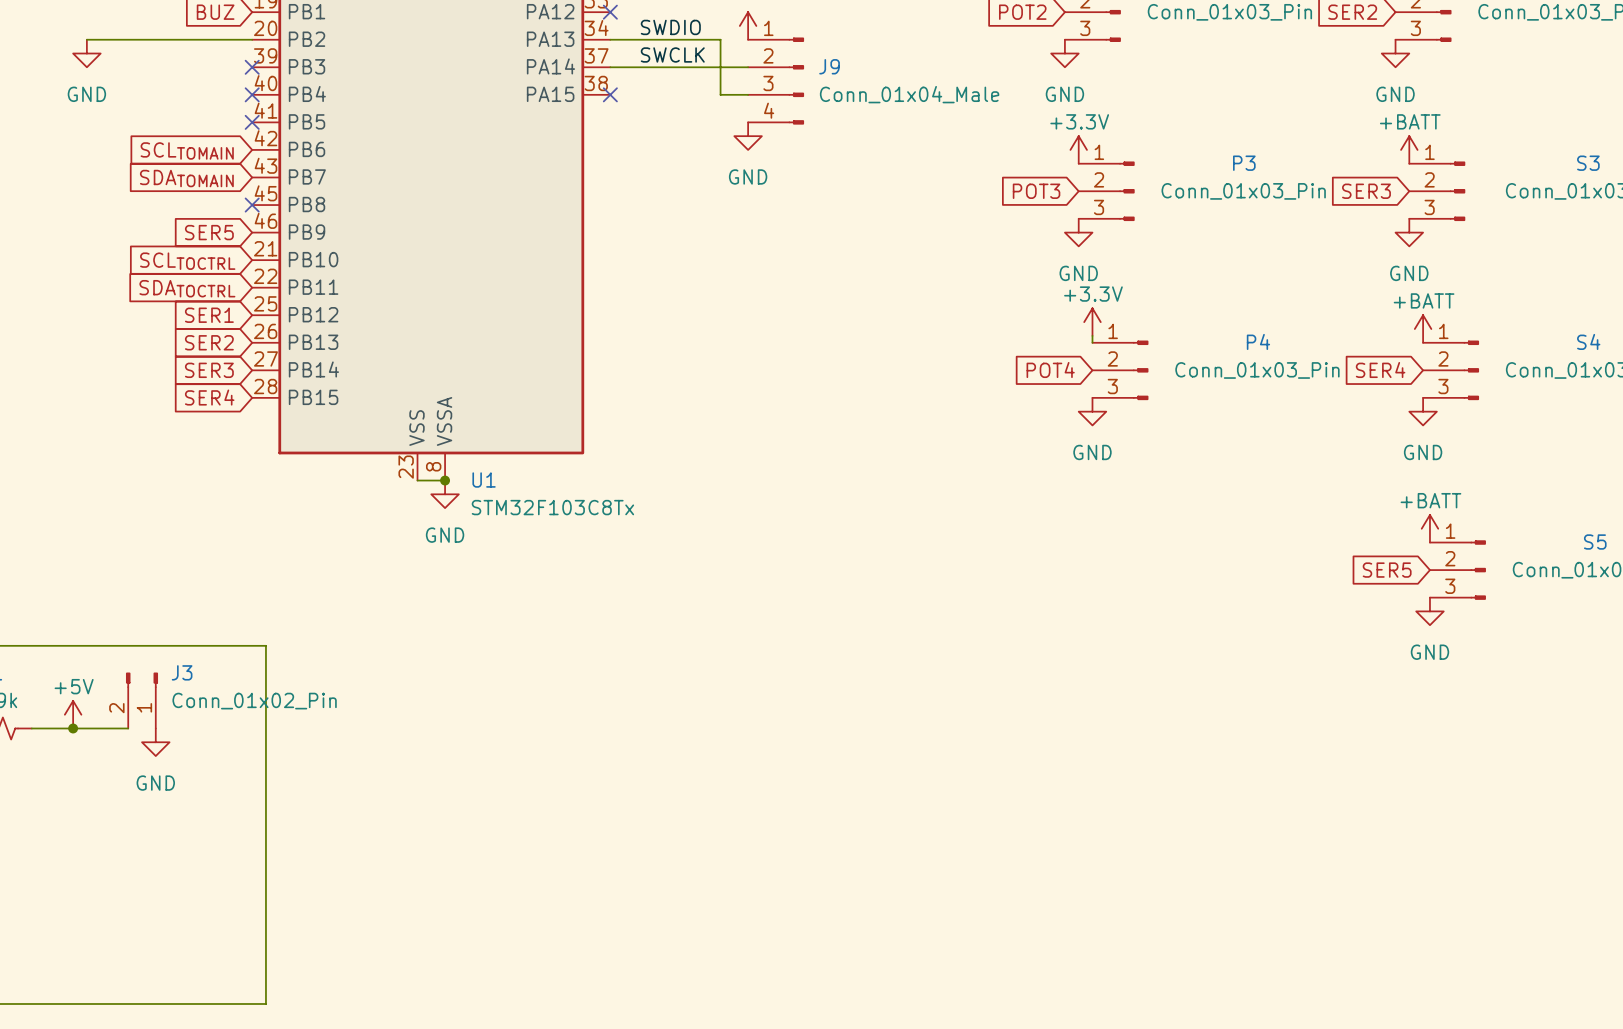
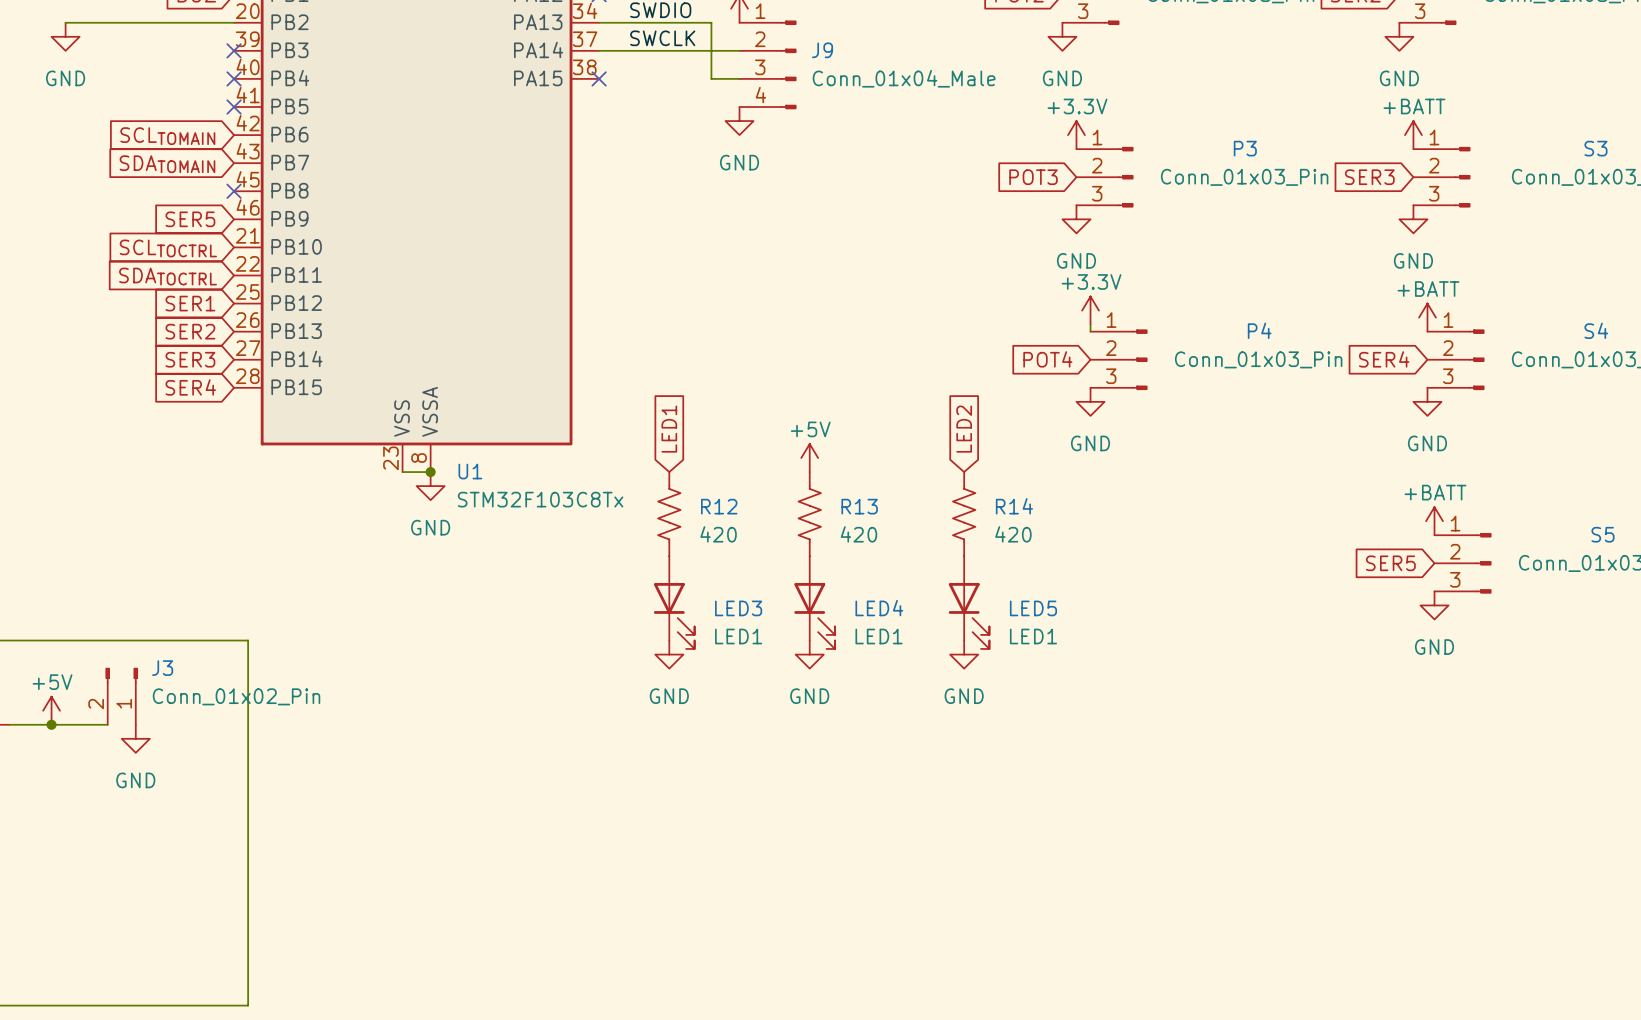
global label: none -> LED1 (669, 429)
global label: none -> LED2 (964, 429)
power symbol: none -> +5V (809, 458)
R12: none -> 420 (669, 514)
R13: none -> 420 (809, 514)
R14: none -> 420 (964, 514)
LED3: none -> LED1 (674, 602)
LED4: none -> LED1 (814, 602)
LED5: none -> LED1 (969, 602)
power symbol: none -> GND (669, 654)
power symbol: none -> GND (809, 654)
power symbol: none -> GND (964, 654)

